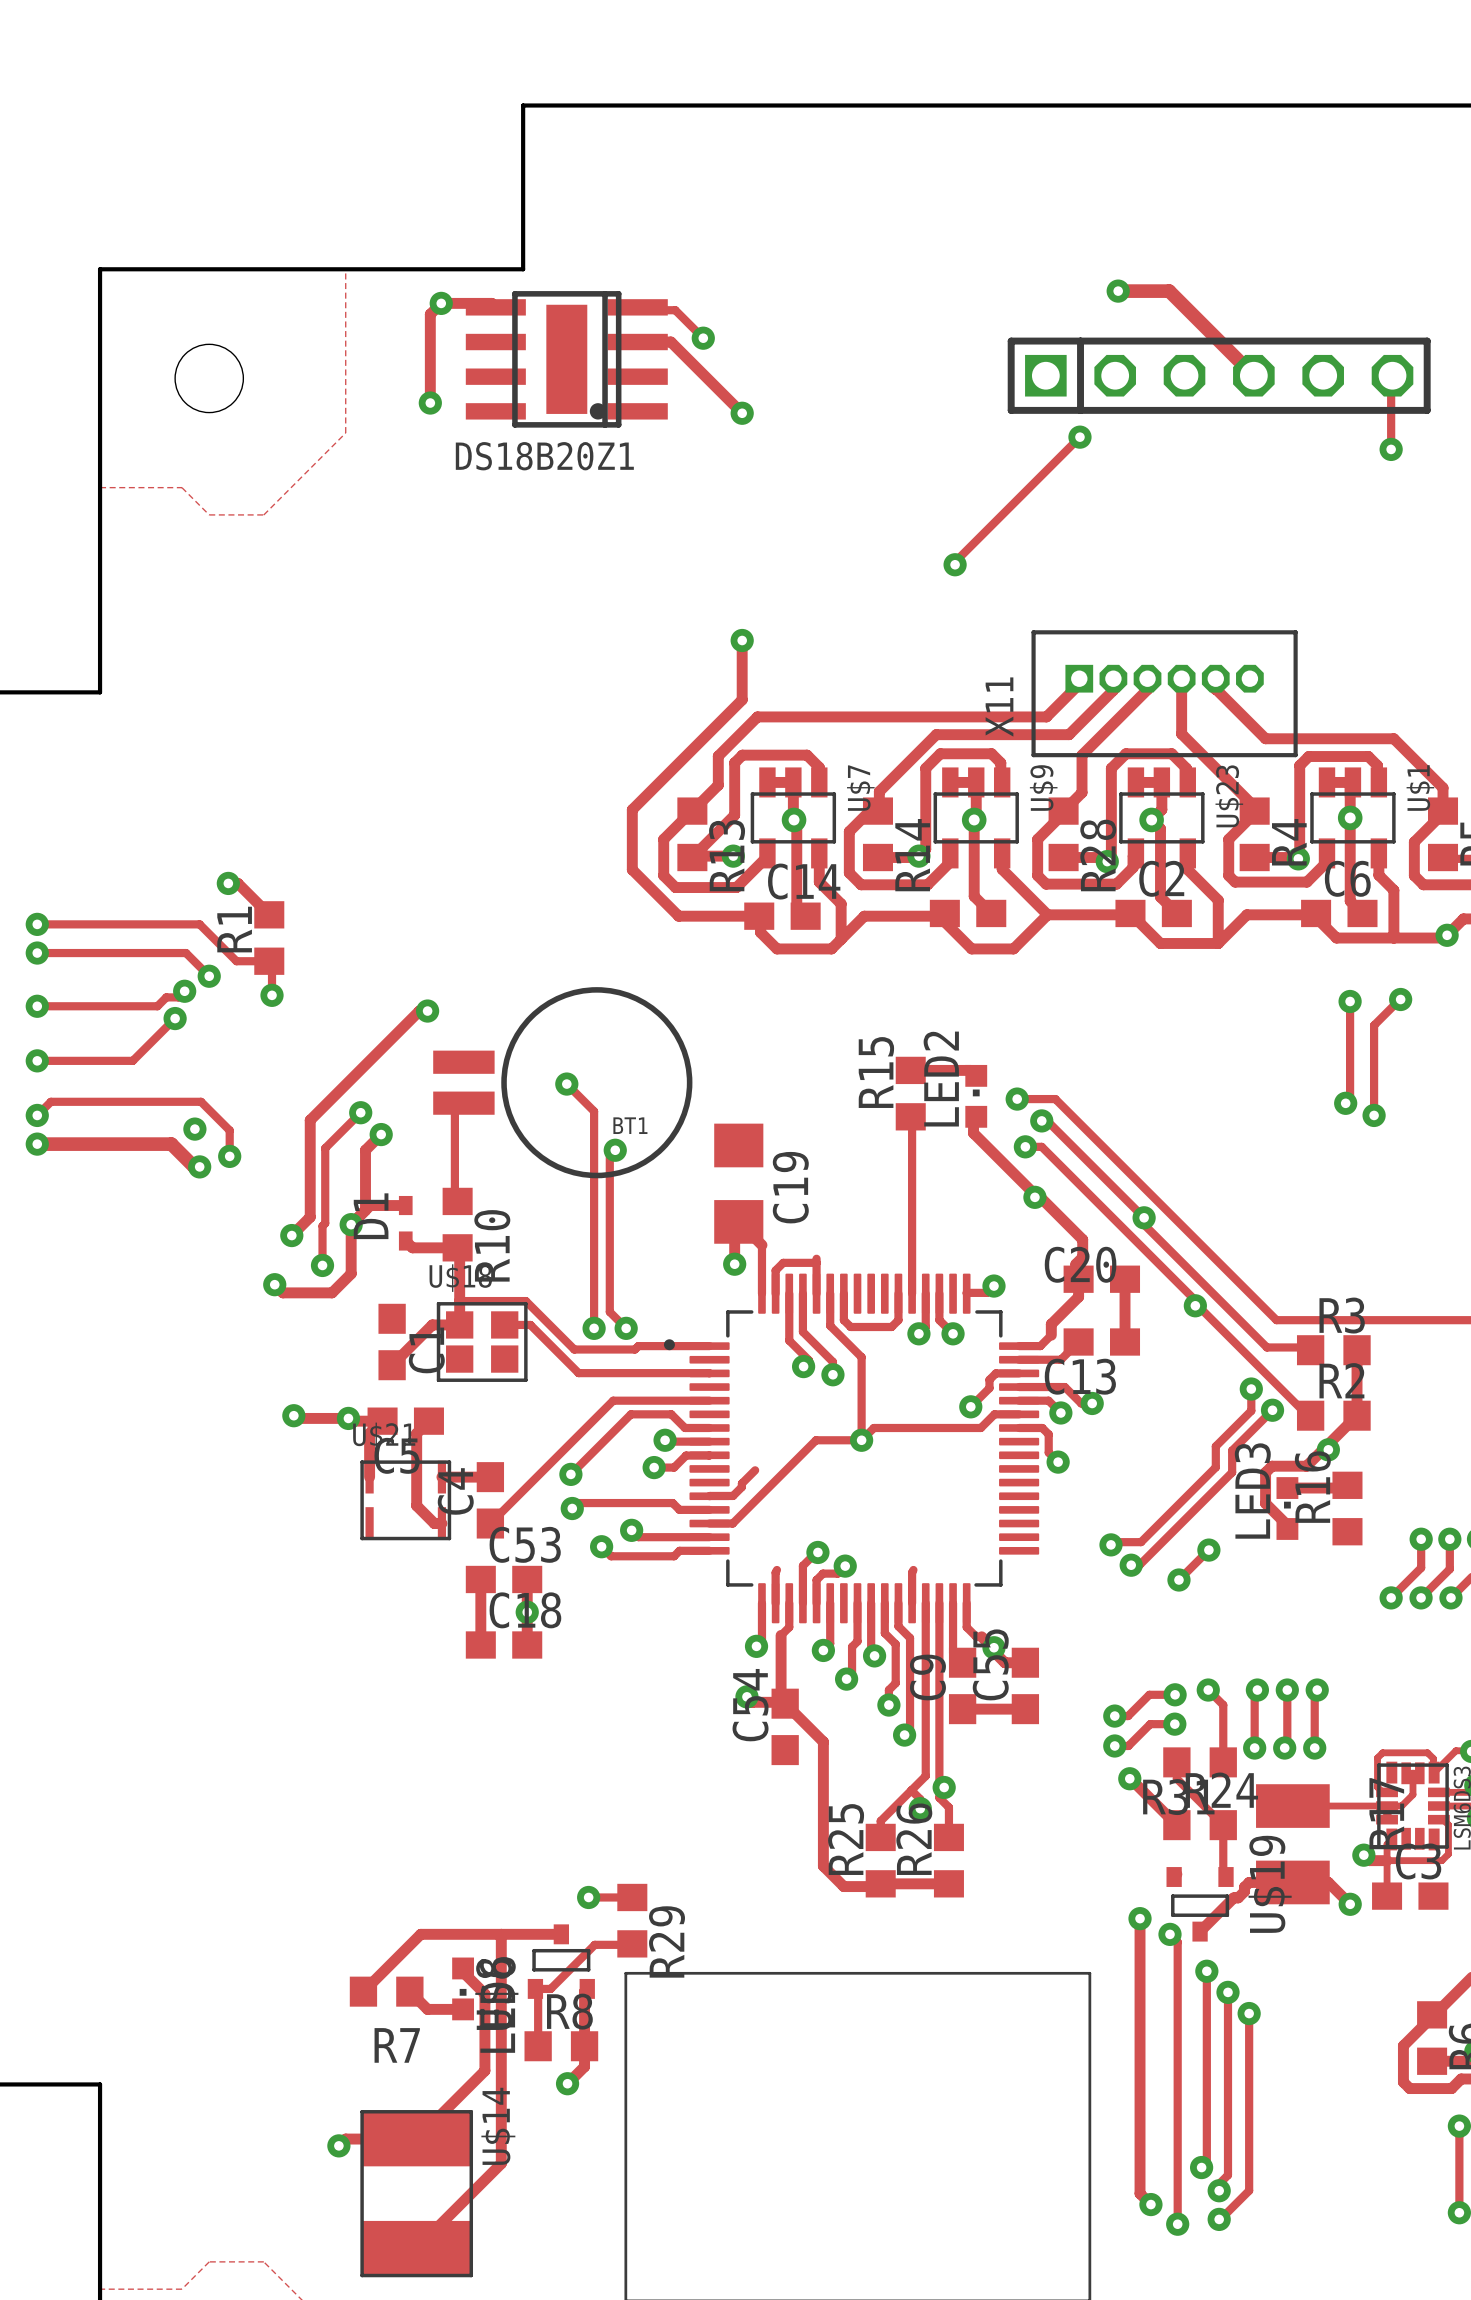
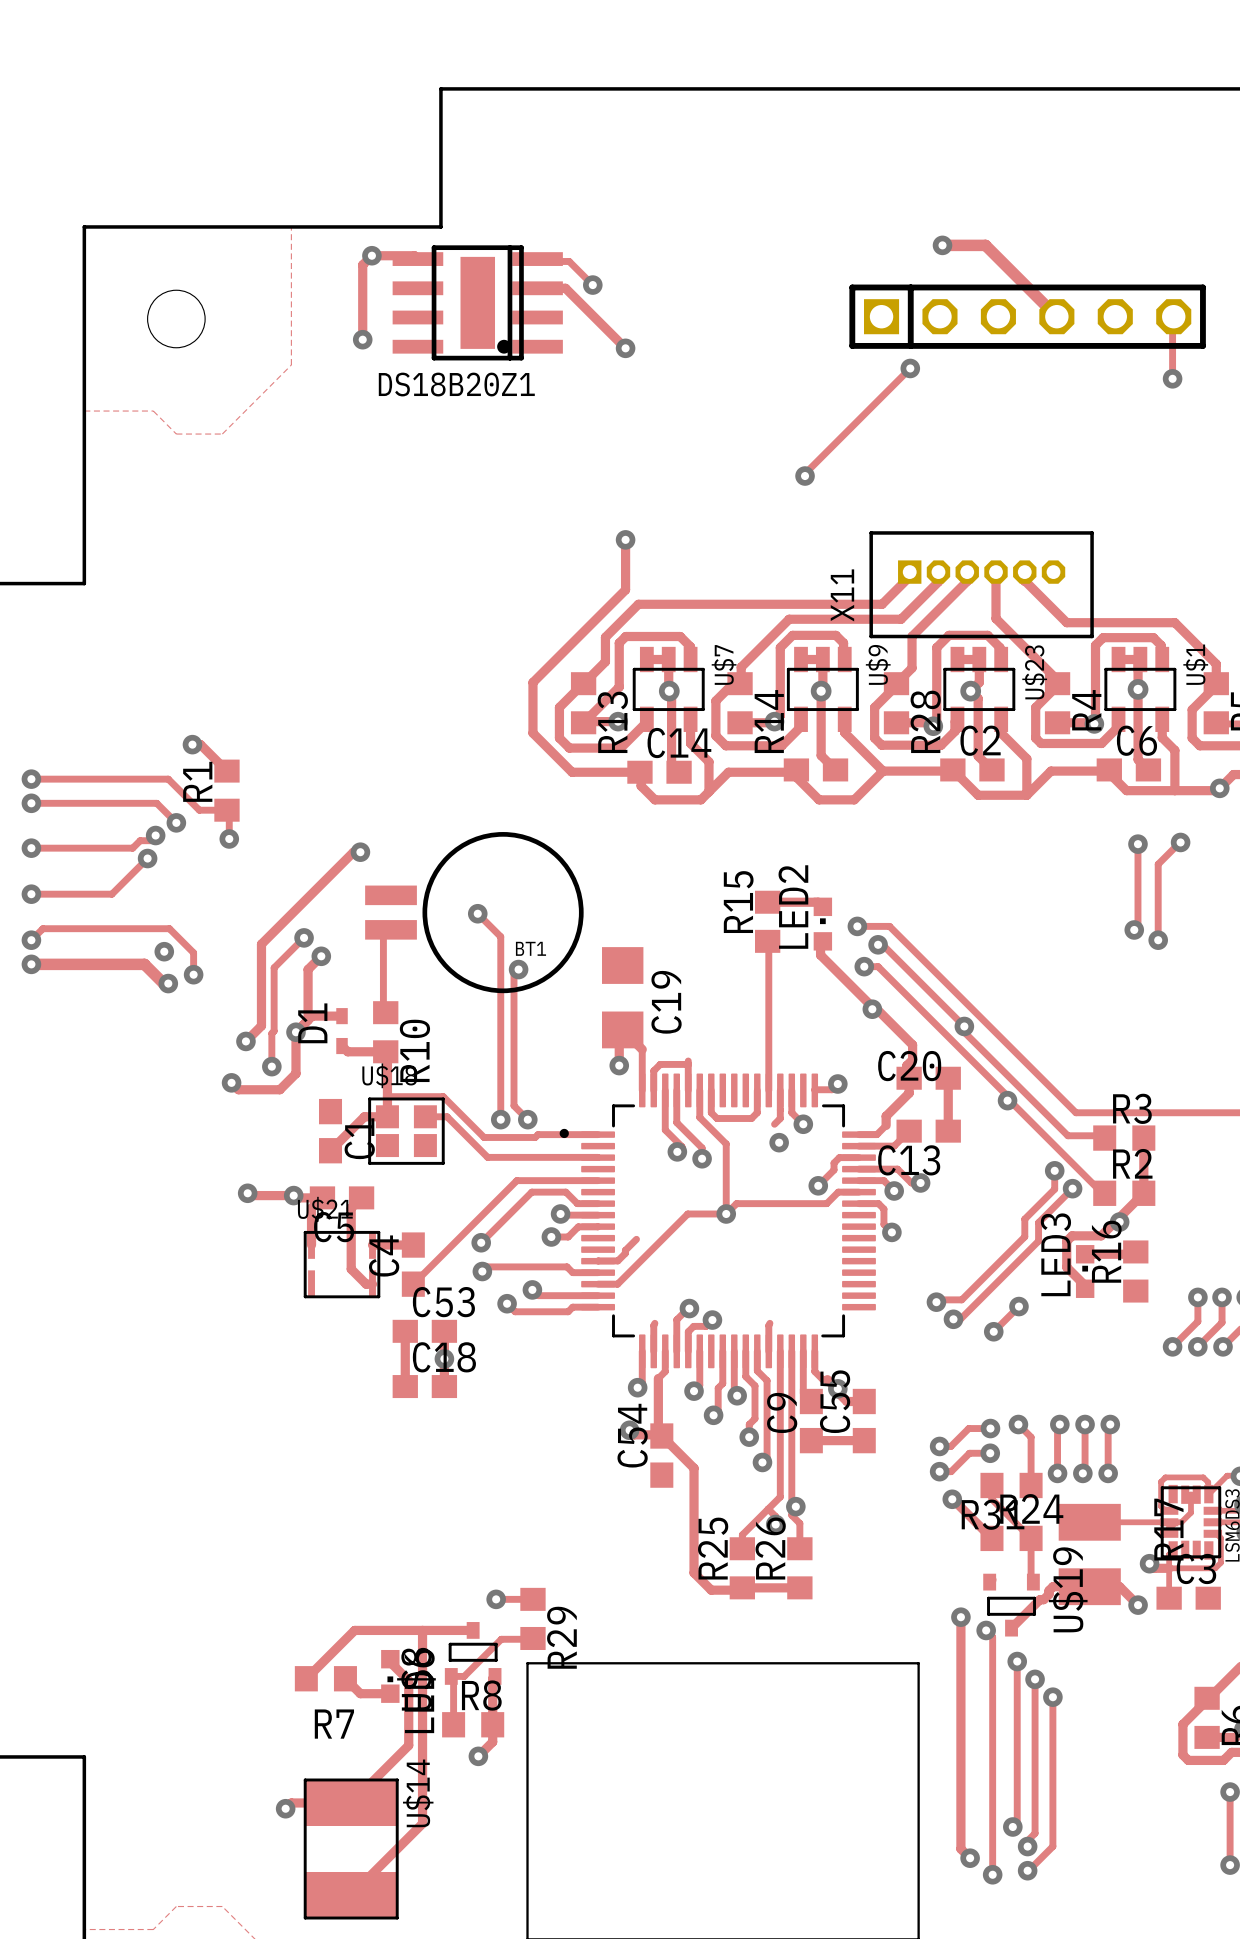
via position: (918, 1333) -> (779, 1142)

